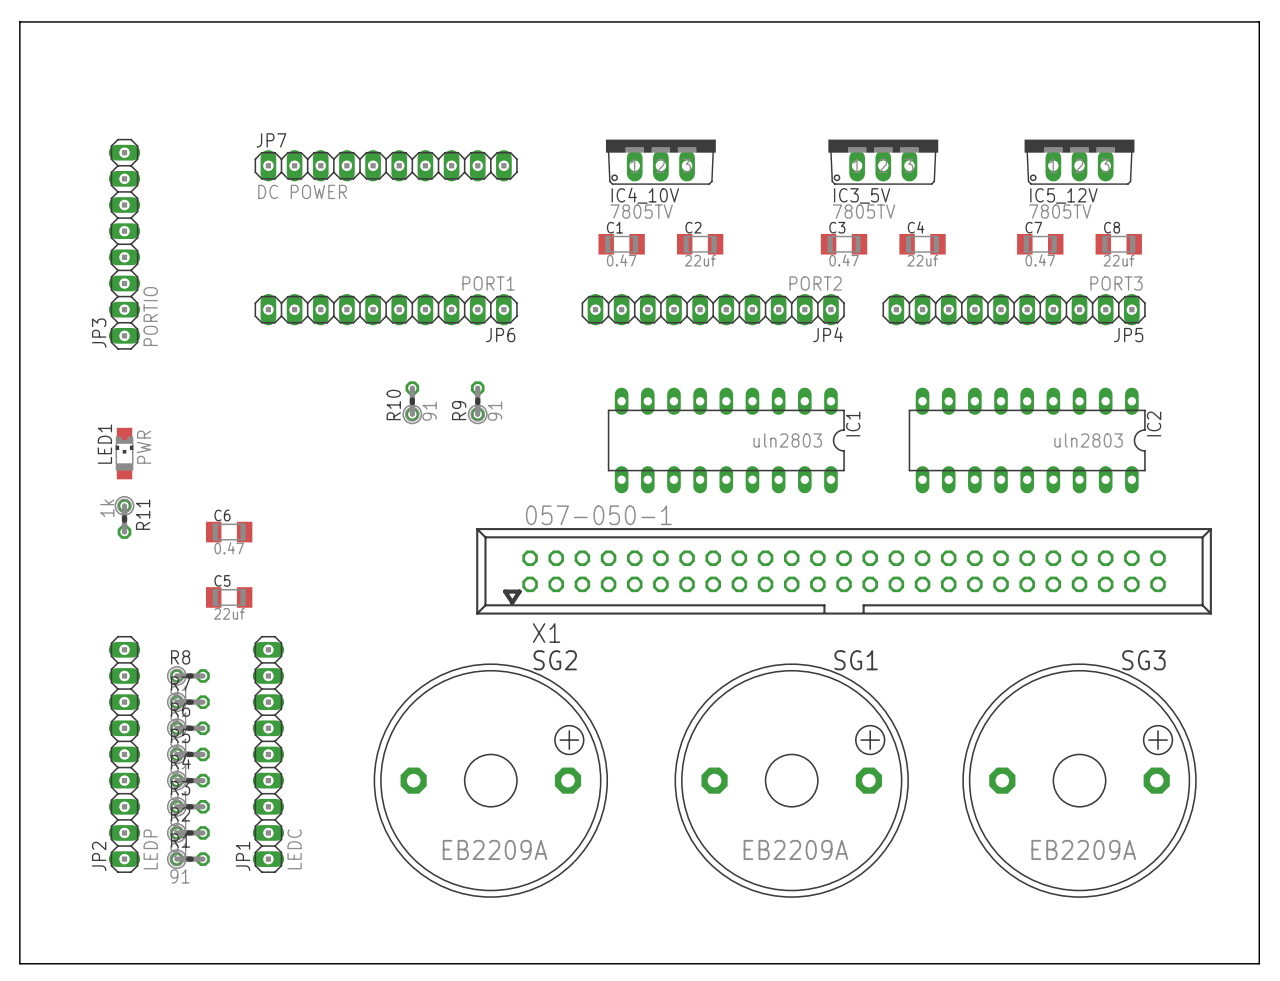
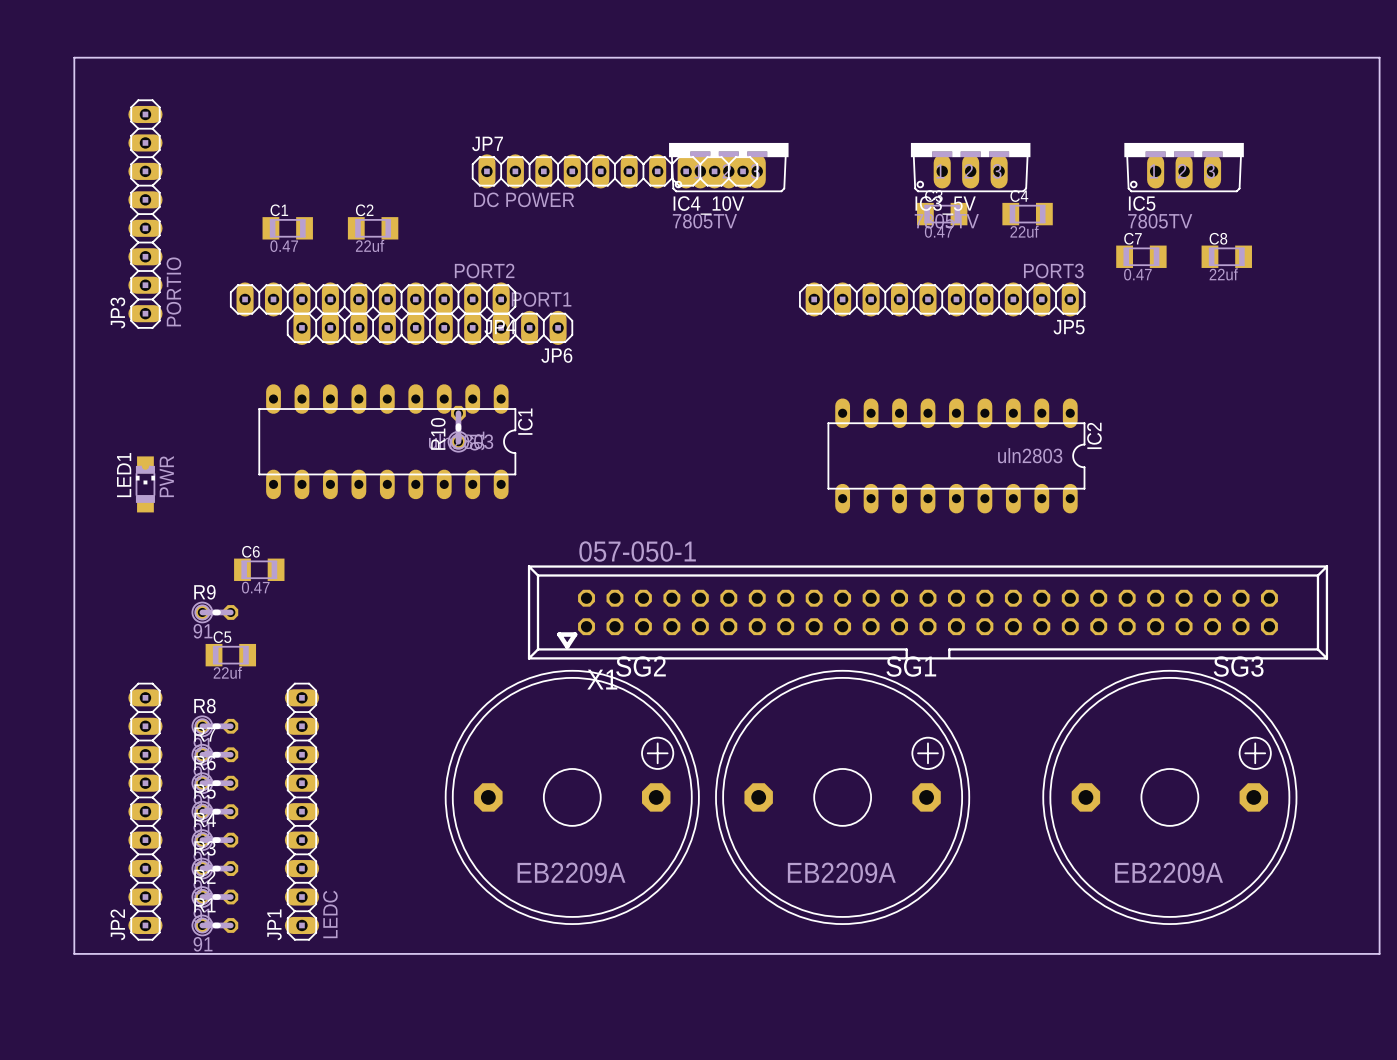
board edge: (1259, 61) (1259, 21) (19, 21) (19, 963) (1259, 963) (1259, 885) -> (1379, 57) (74, 57) (74, 953) (1379, 953)
JP7 position: (386, 165) -> (614, 171)
IC5_12V name: IC5_12V (1063, 195) -> IC5 (1142, 203)
JP3 position: (124, 244) -> (145, 214)
C1 position: (621, 244) -> (287, 228)
C2 position: (700, 244) -> (373, 228)
C3 position: (844, 244) -> (942, 214)
C4 position: (922, 244) -> (1027, 214)
JP4 position: (713, 309) -> (373, 299)
JP5 position: (1014, 309) -> (942, 299)
R9 rotation: 0° (477, 402) -> 90° clockwise (214, 612)
R9 position: (477, 402) -> (214, 612)
IC1 position: (726, 440) -> (387, 441)
IC2 position: (1027, 440) -> (956, 455)
R11: 1k (124, 517) -> none
C5 position: (229, 597) -> (230, 655)
SG2 position: (490, 780) -> (572, 797)
SG1 position: (791, 780) -> (842, 797)
SG3 position: (1079, 780) -> (1169, 797)
JP2 value: LEDP (150, 849) -> none

